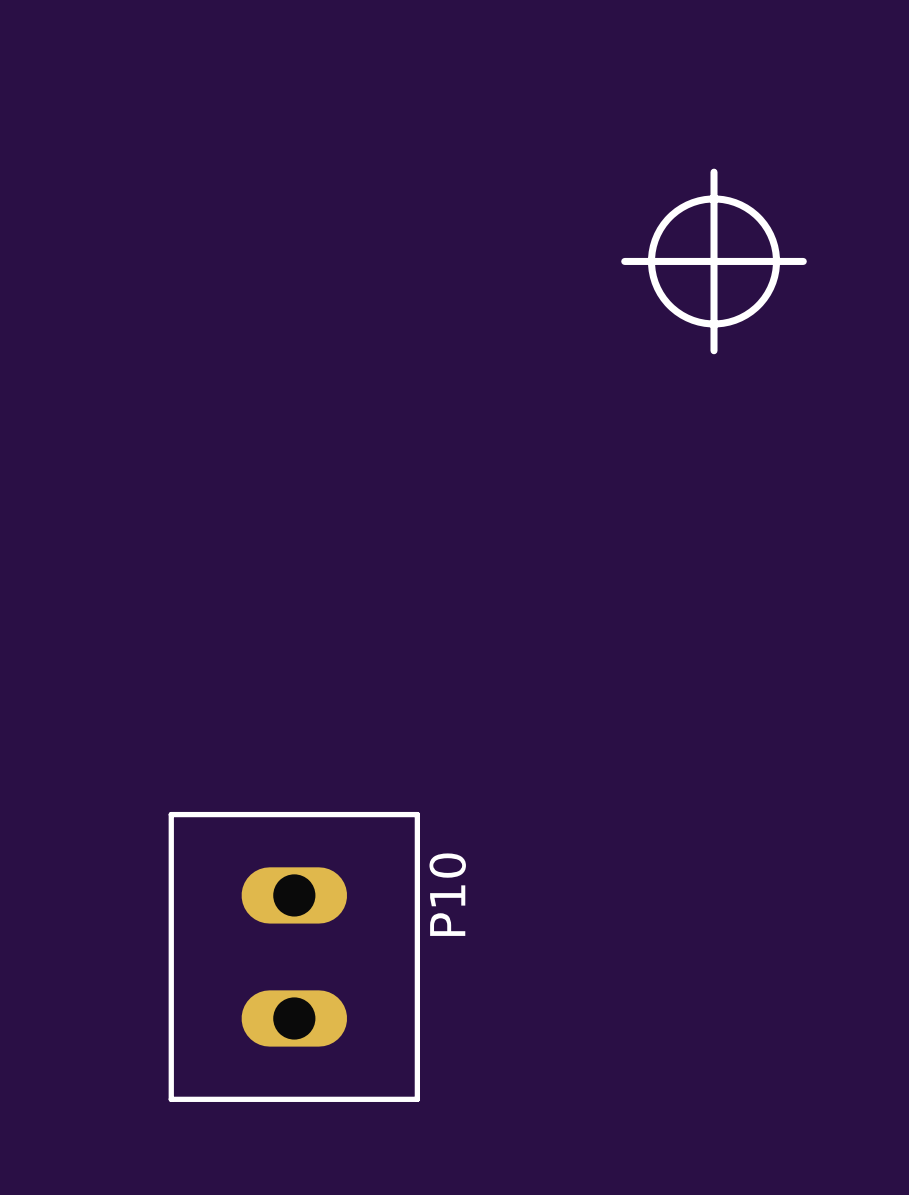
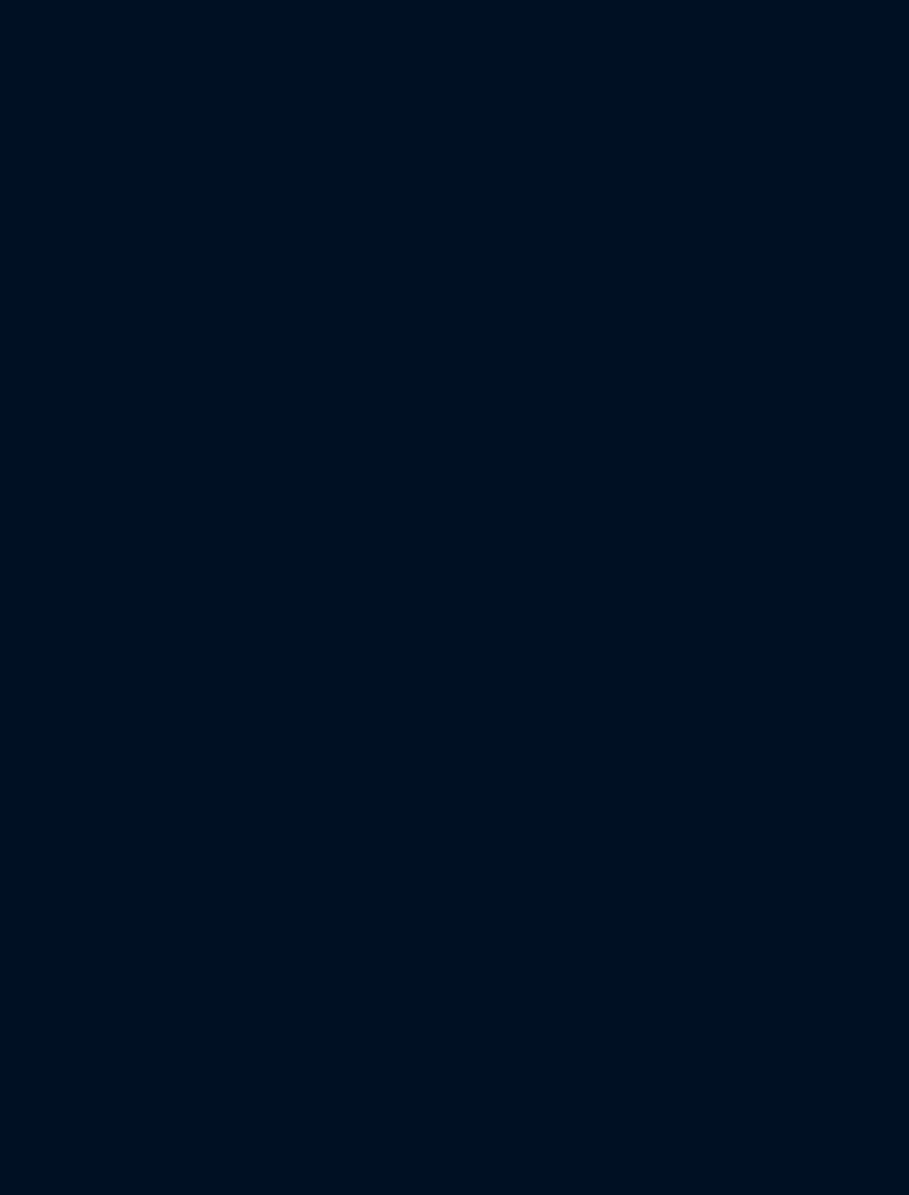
line: (714, 172) (714, 350) -> none
drawing: [647, 195, 781, 328] -> none
line: (624, 261) (803, 261) -> none
P10: (294, 956) -> none

